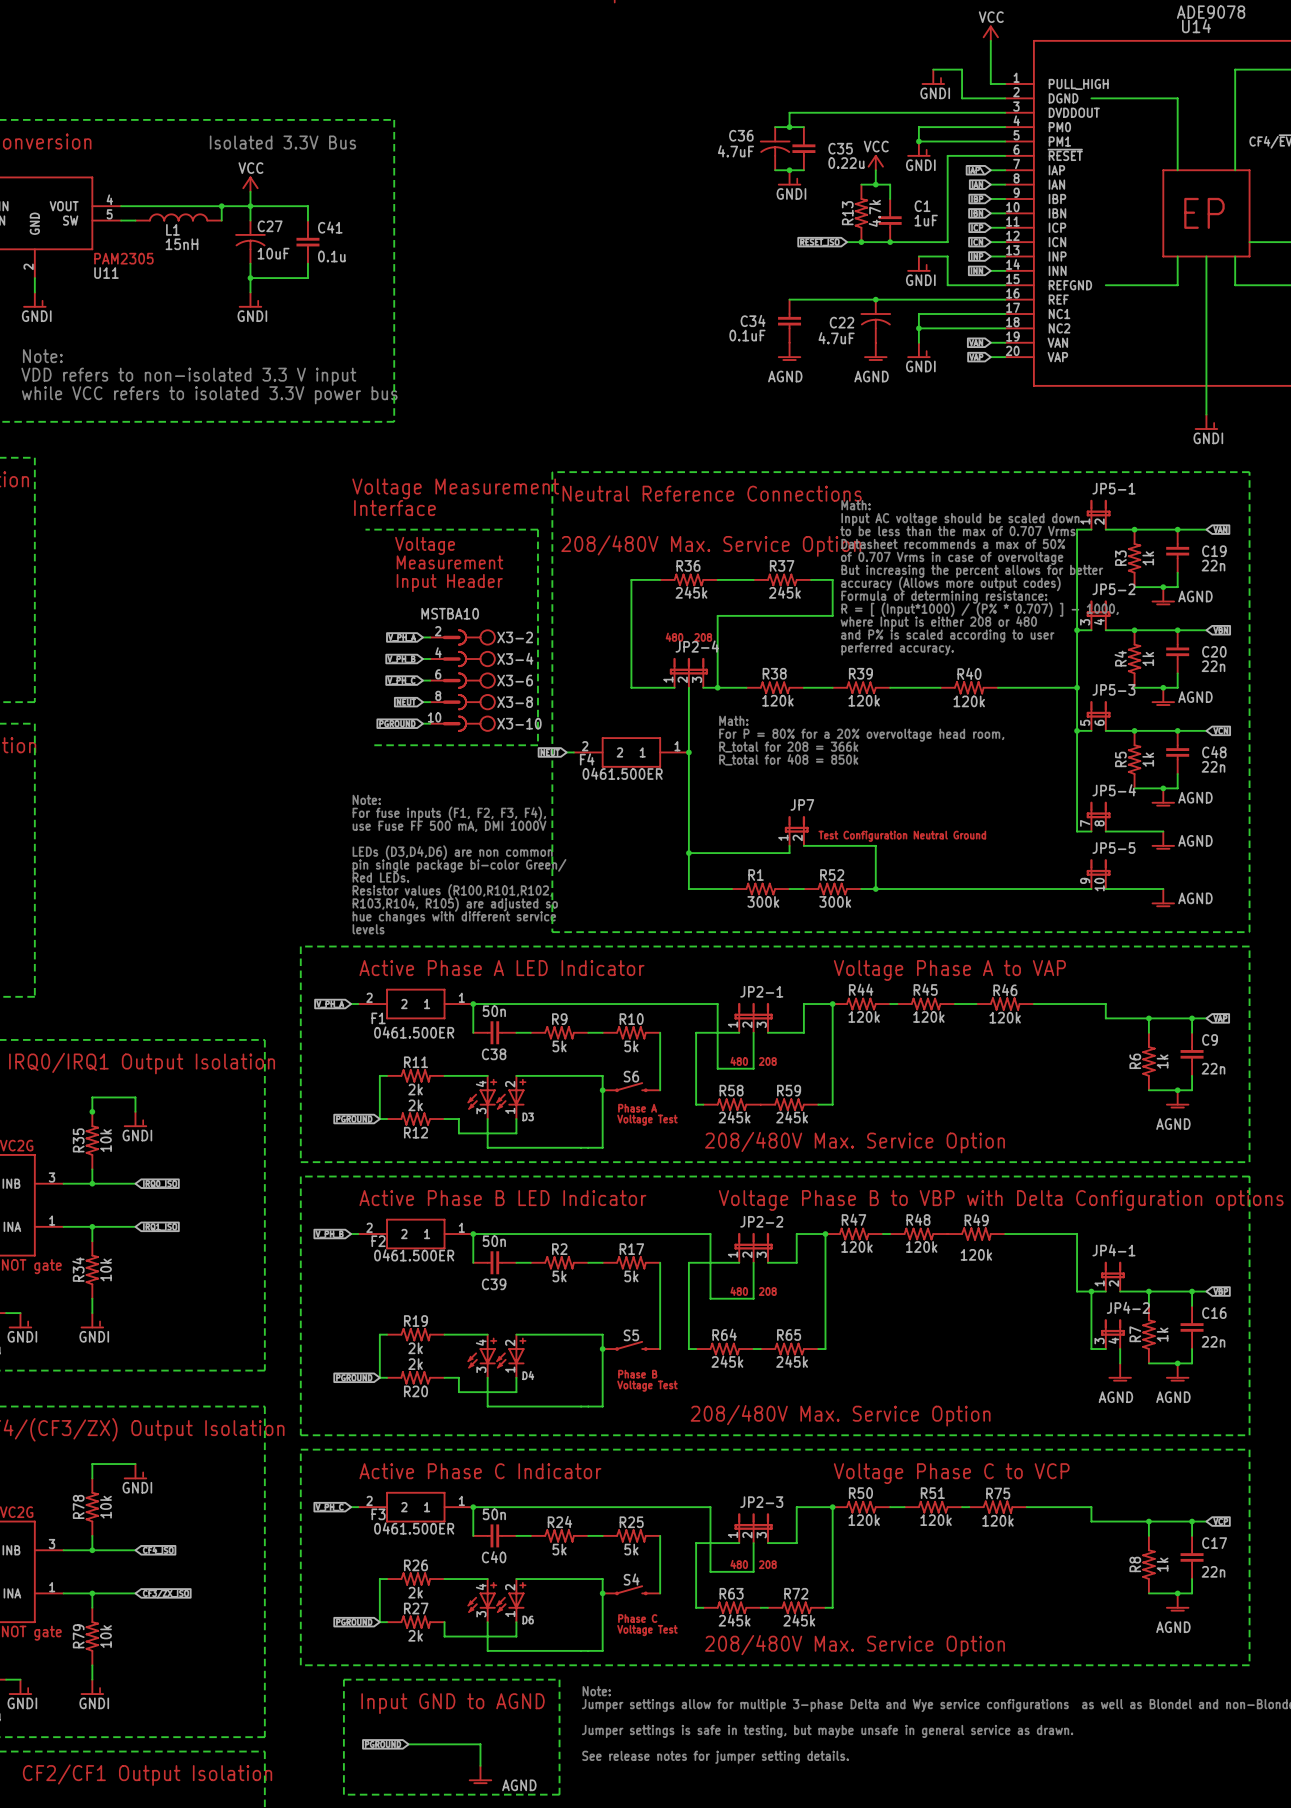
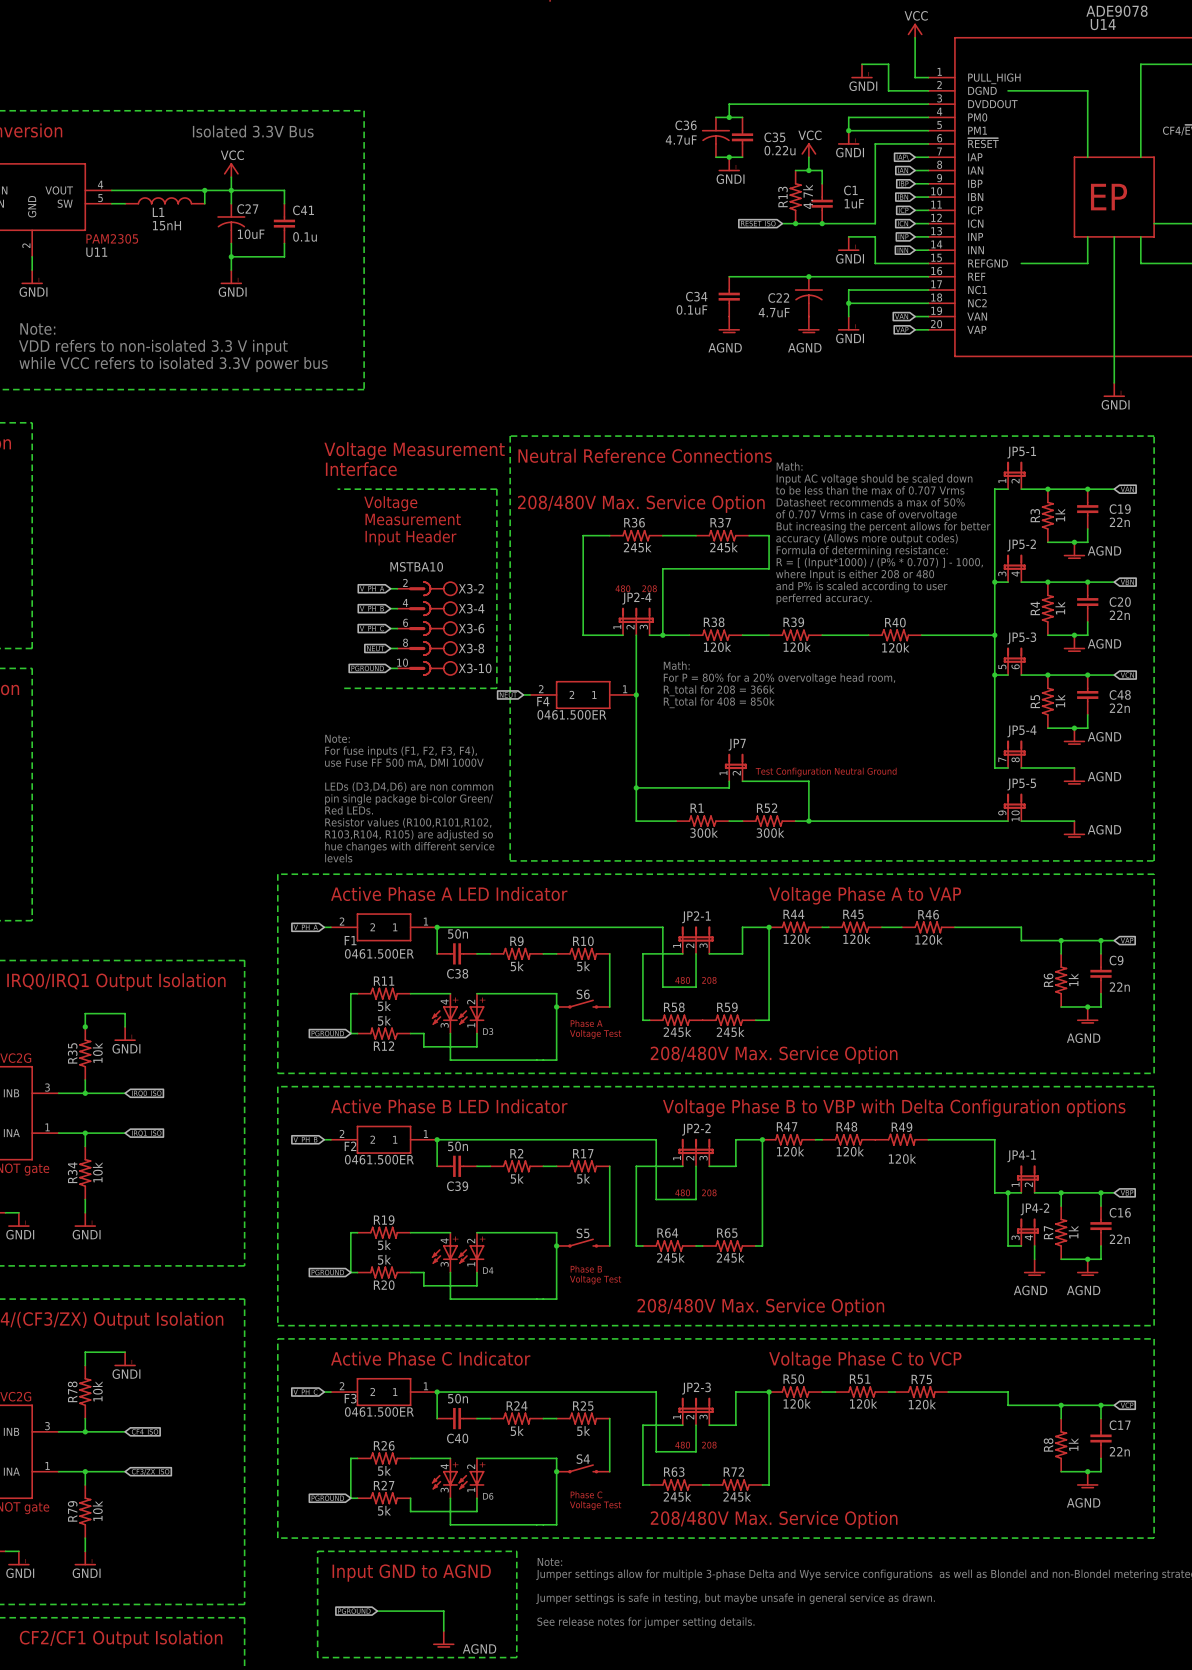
R11 value: 2k (415, 1089) -> 5k (384, 1006)
R12 value: 2k (415, 1105) -> 5k (384, 1020)
R19 value: 2k (415, 1348) -> 5k (384, 1245)
R20 value: 2k (415, 1364) -> 5k (384, 1259)
R26 value: 2k (415, 1592) -> 5k (384, 1470)
R27 value: 2k (415, 1635) -> 5k (384, 1510)

